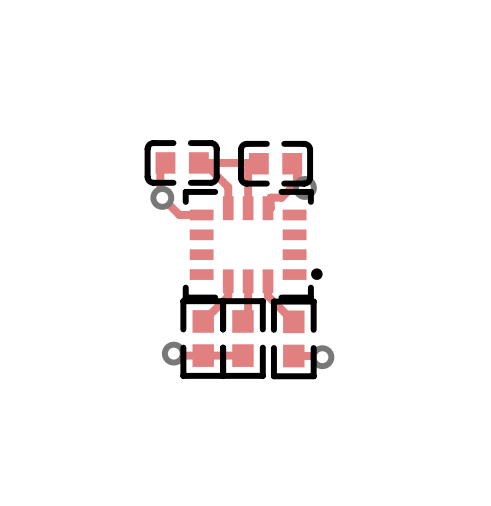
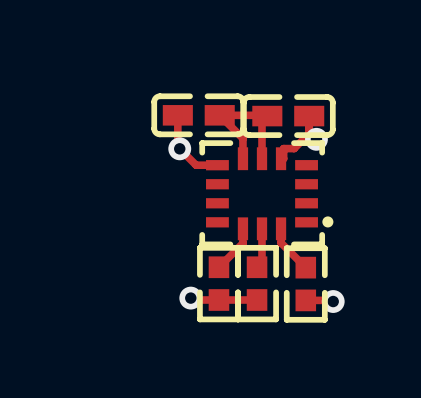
part footprint: [144, 140, 220, 186] -> [151, 93, 247, 138]
part footprint: [237, 140, 314, 187] -> [240, 94, 336, 138]

